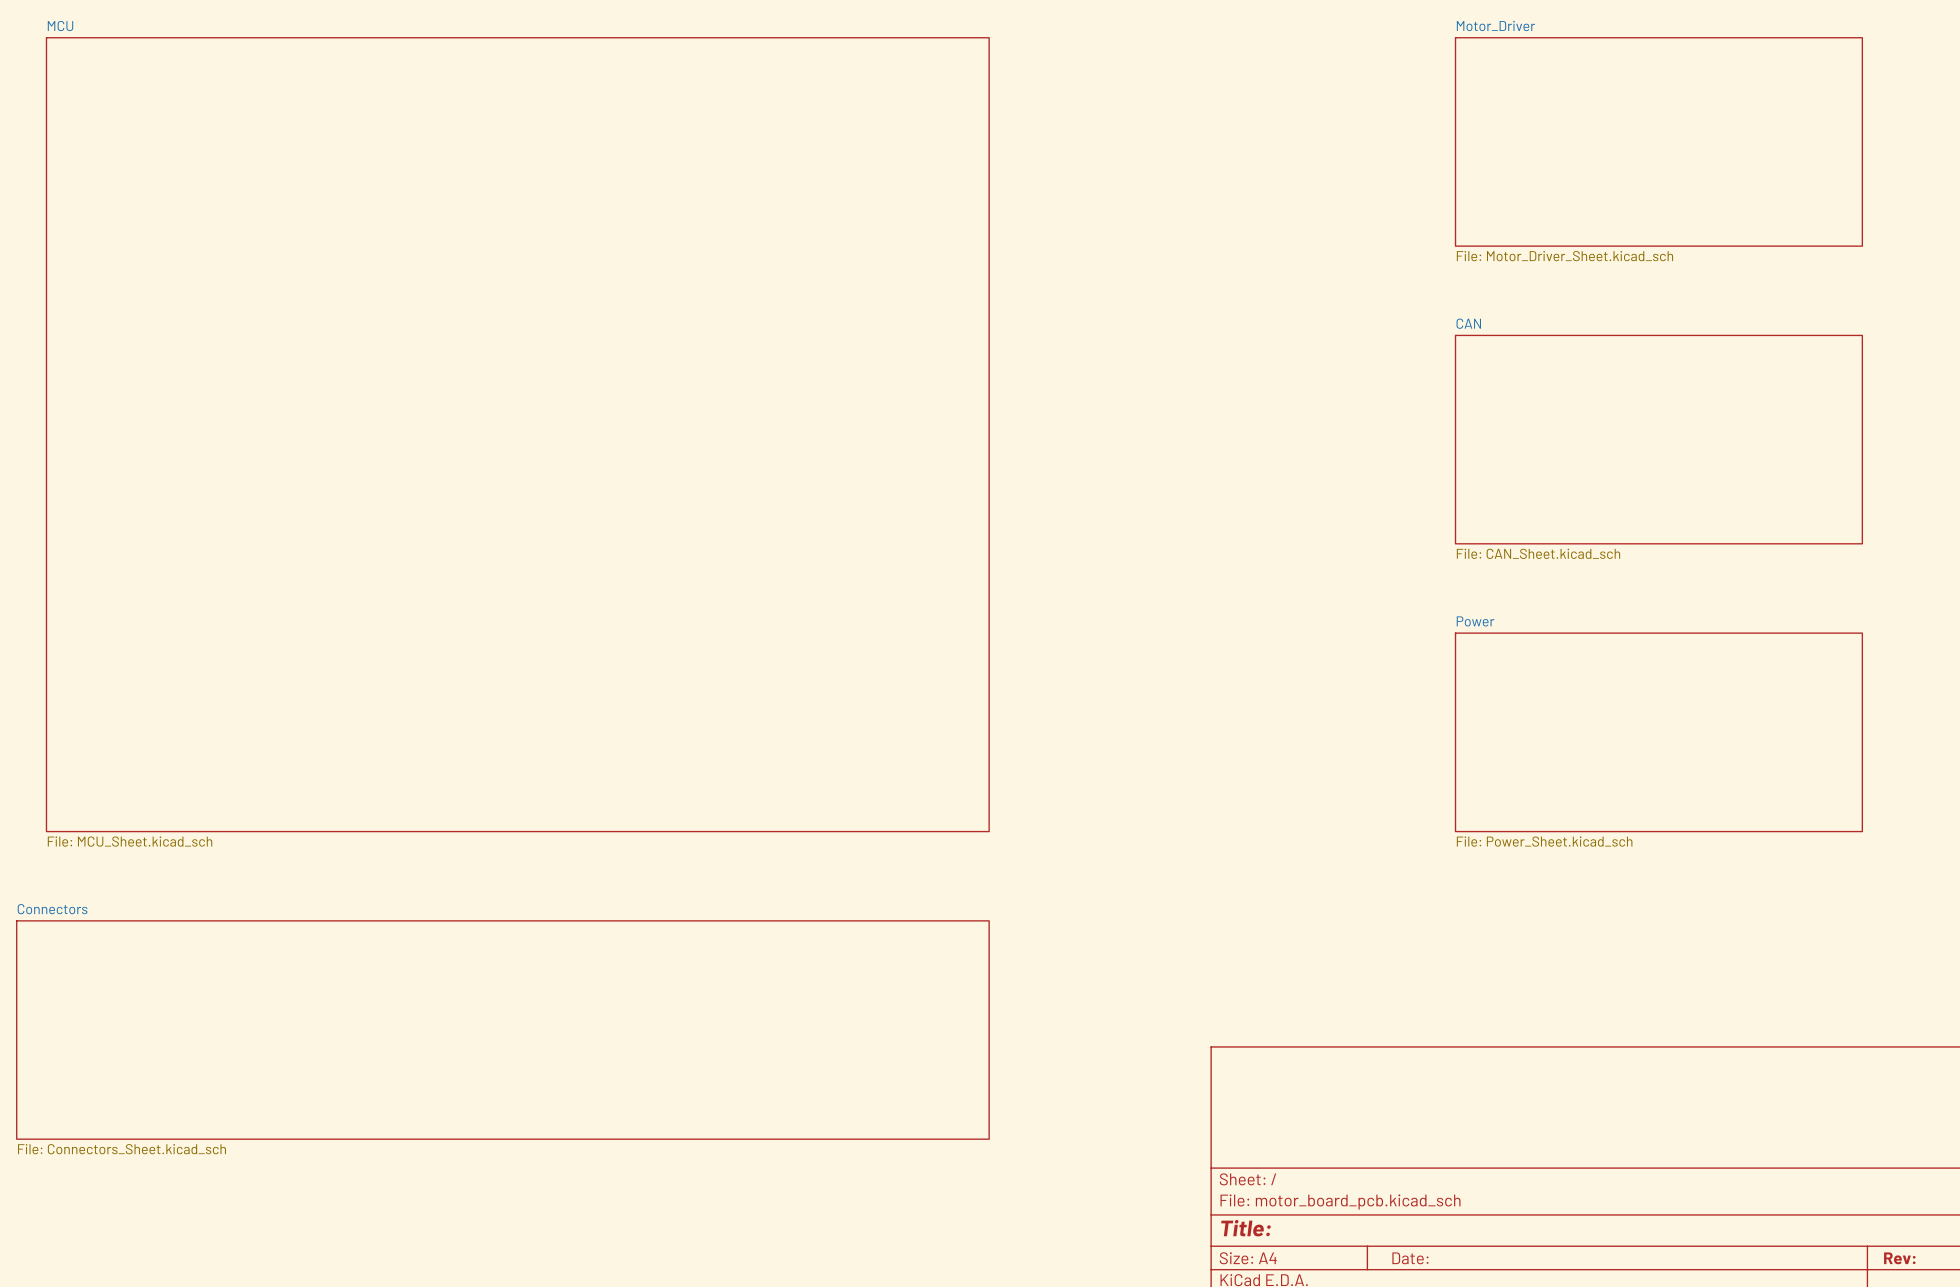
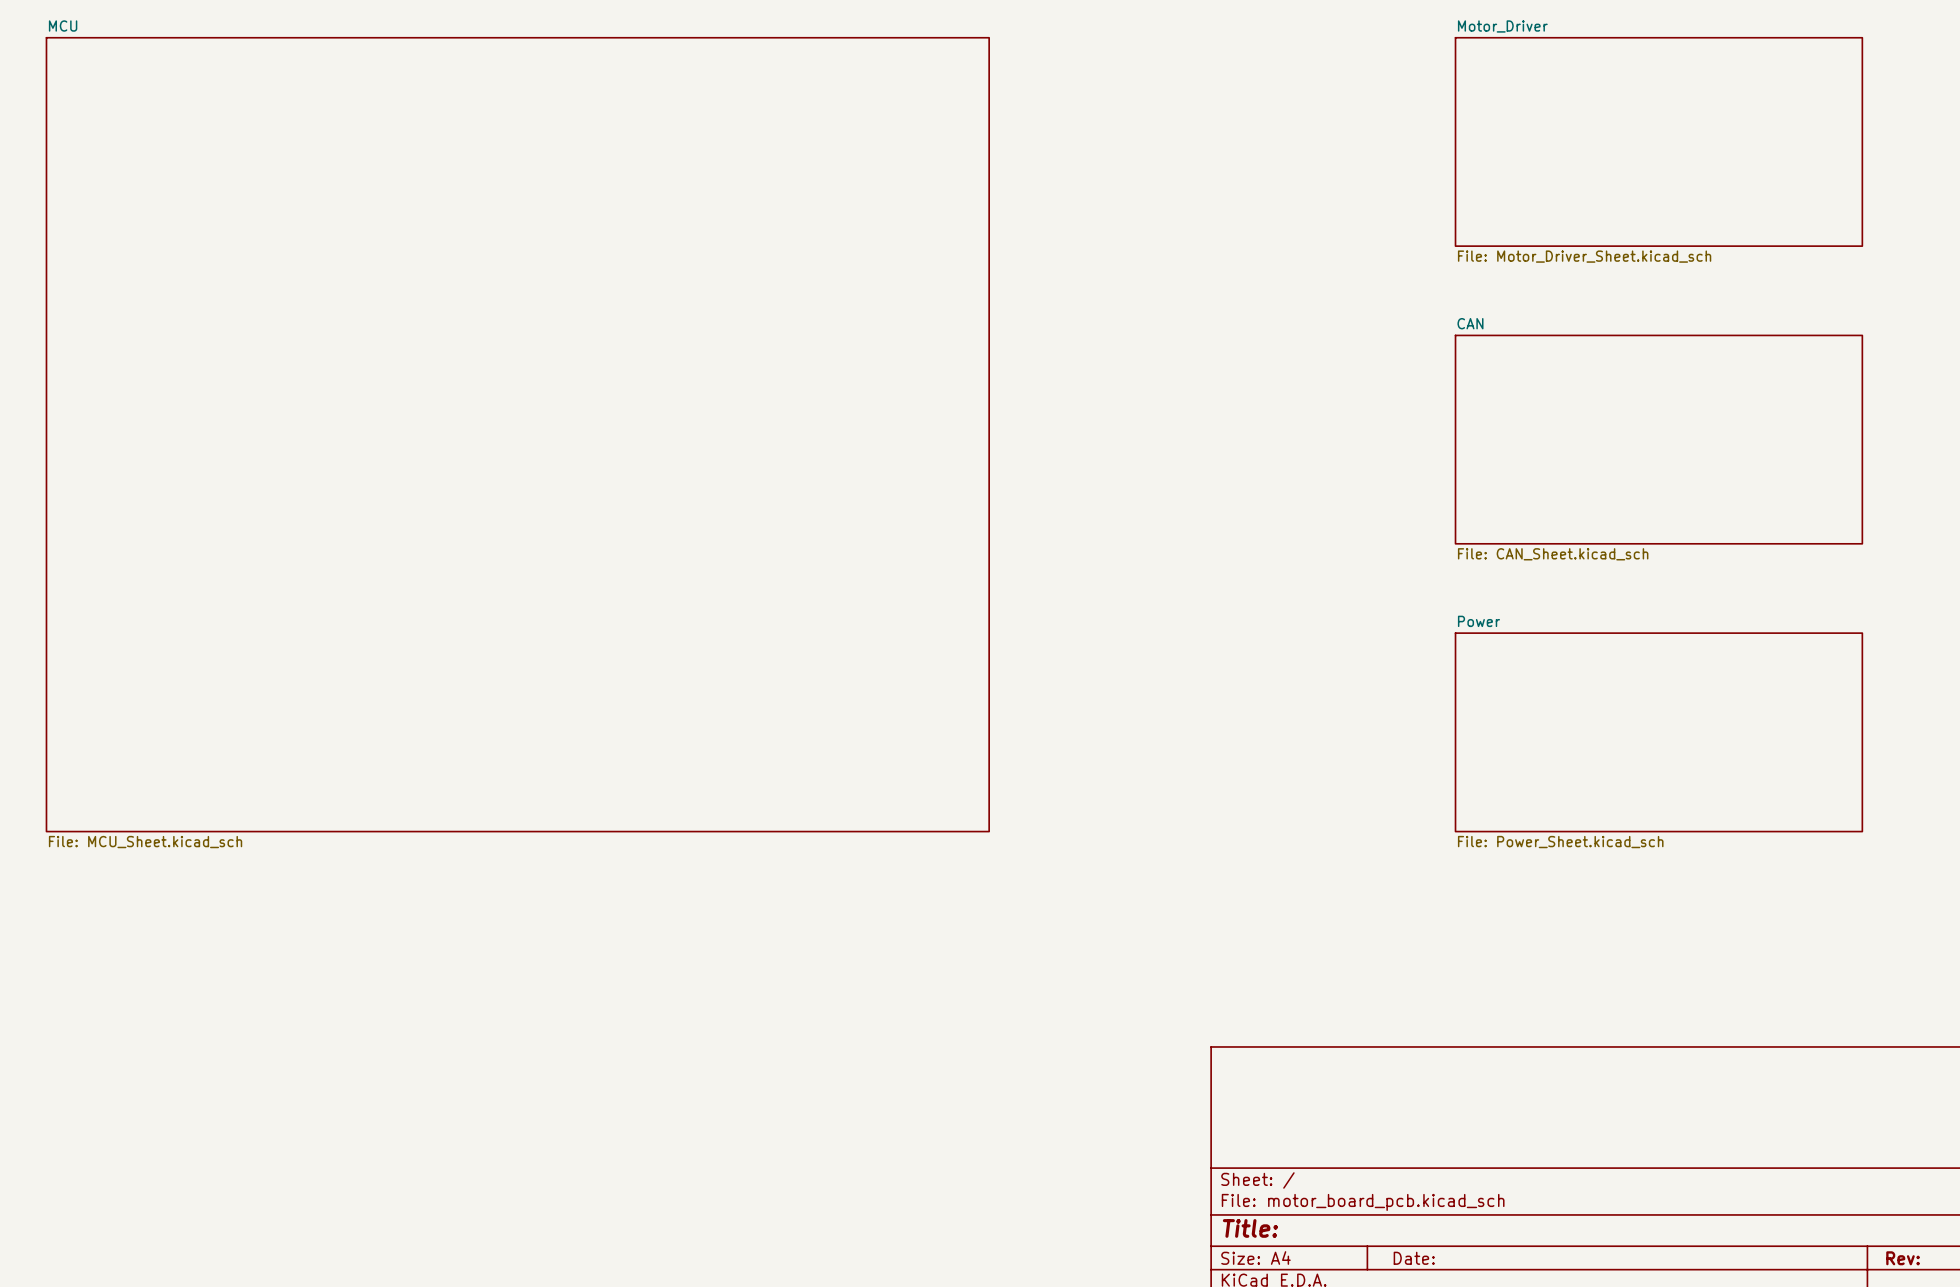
sheet Connectors: File: Connectors_Sheet.kicad_sch (502, 1030) -> none

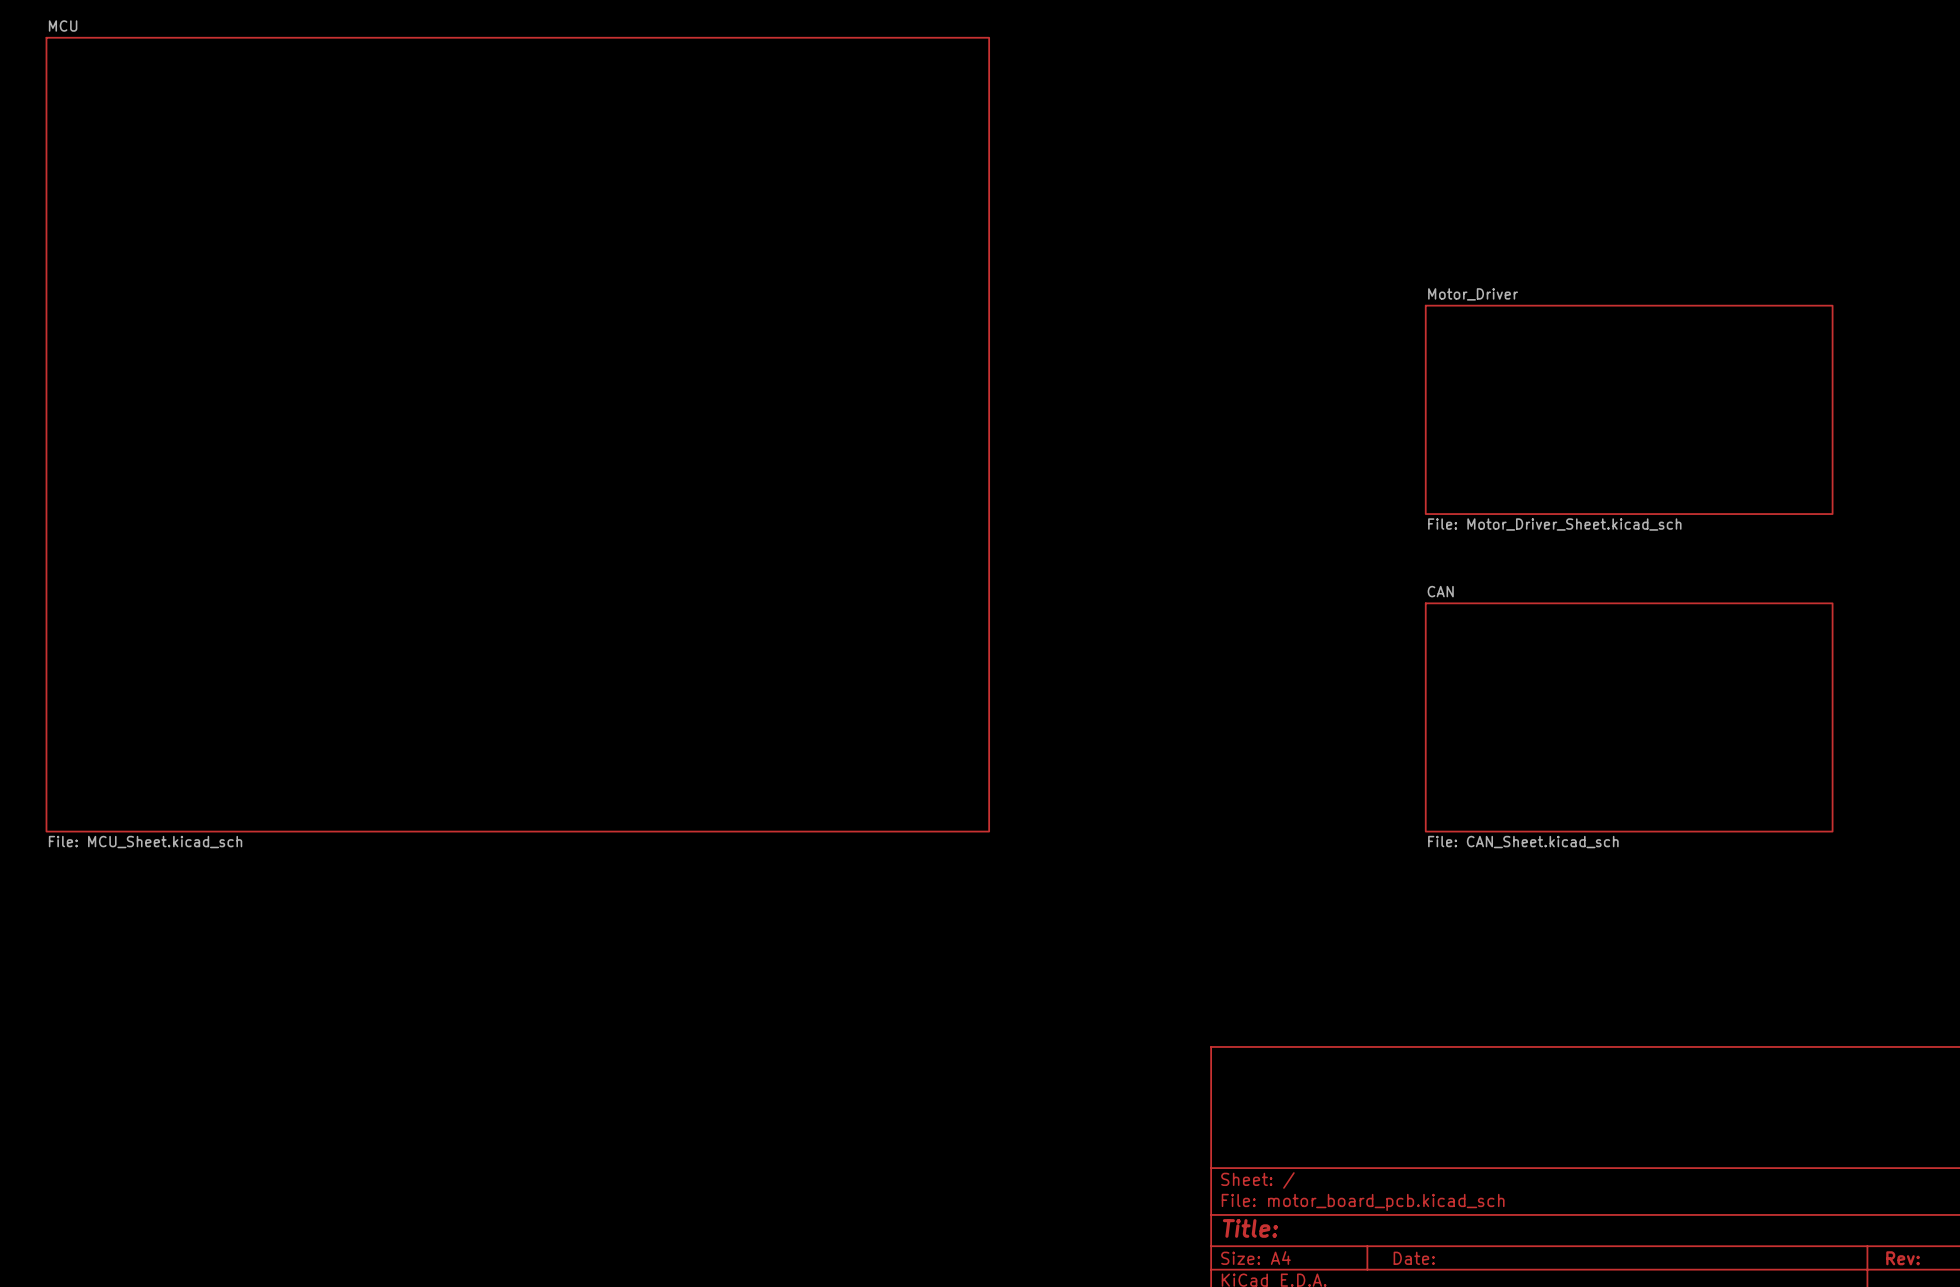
sheet Motor_Driver: File: Motor_Driver_Sheet.kicad_sch (1658, 141) -> none
sheet Motor_Driver: none -> File: Motor_Driver_Sheet.kicad_sch (1629, 409)
sheet CAN: File: CAN_Sheet.kicad_sch (1658, 439) -> none
sheet CAN: none -> File: CAN_Sheet.kicad_sch (1629, 717)
sheet Power: File: Power_Sheet.kicad_sch (1658, 732) -> none

